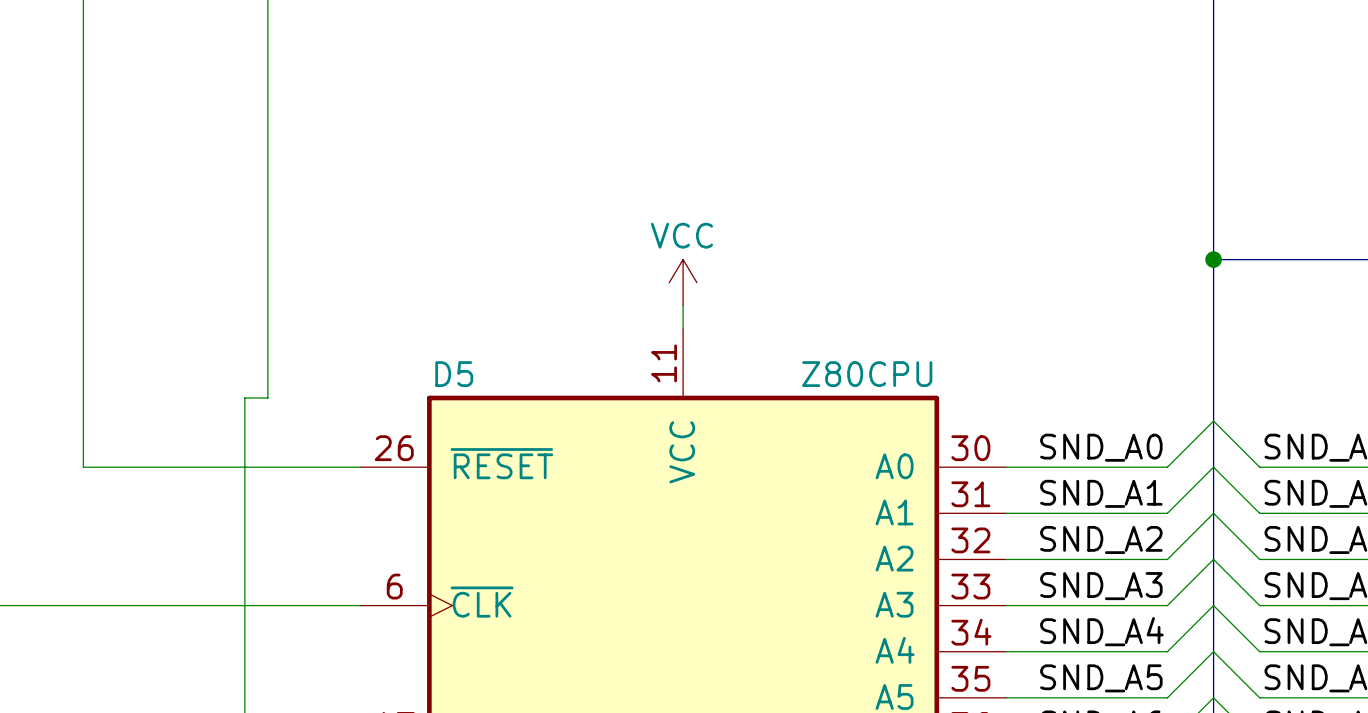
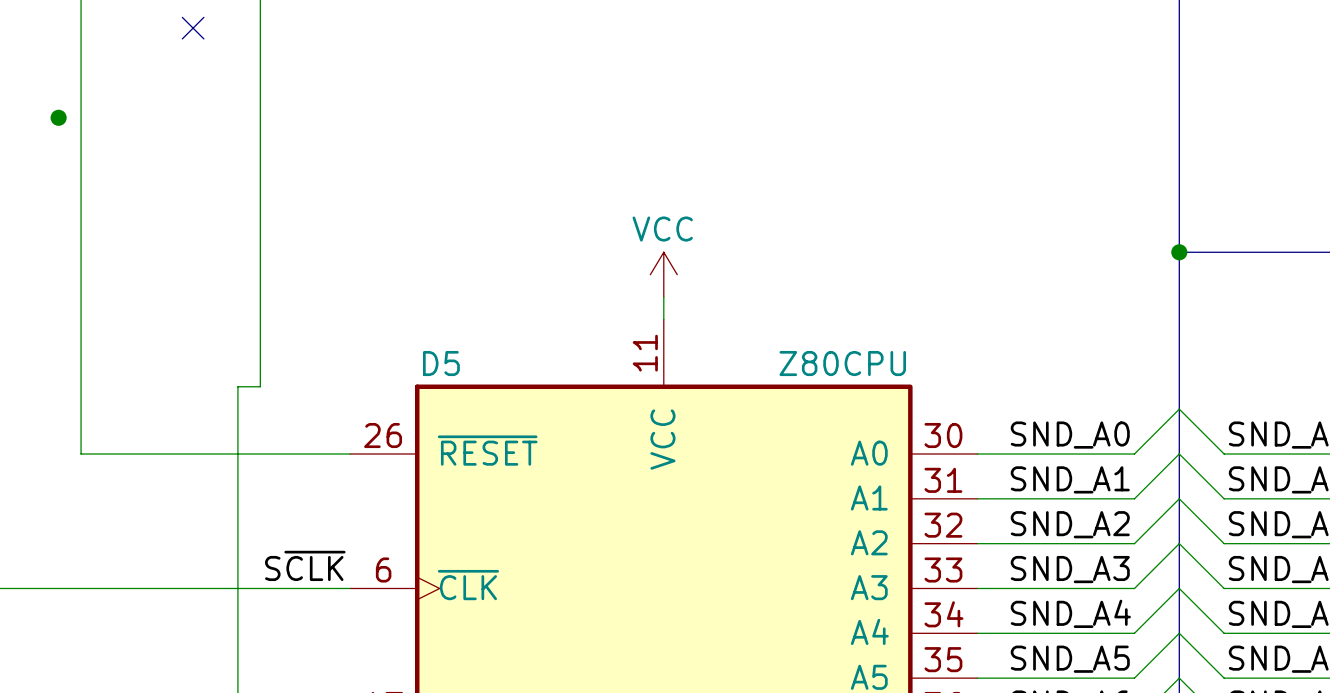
no-connect mark: none -> (193, 28)
junction: none -> (58, 117)
label: none -> S~{CLK} (305, 565)

